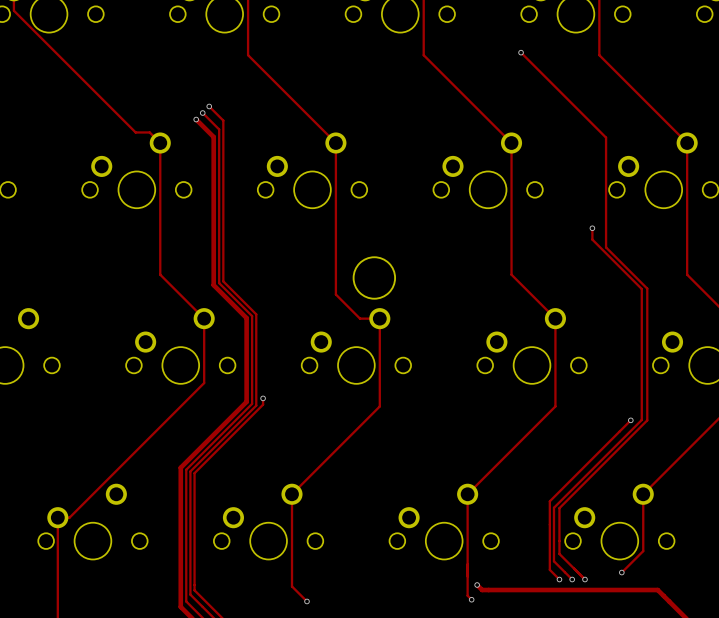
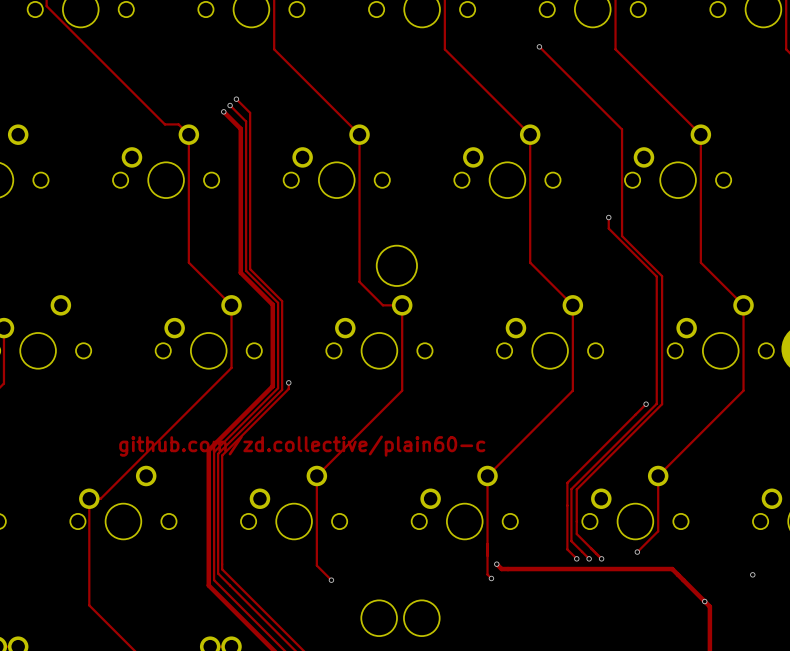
text: none -> github.com/zd.collective/plain60-c (302, 446)

